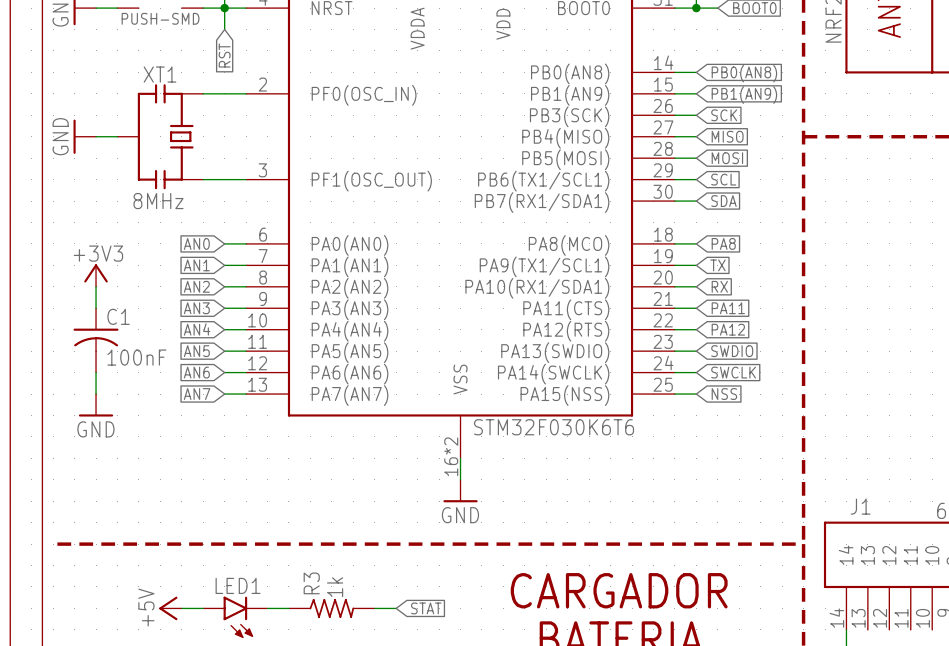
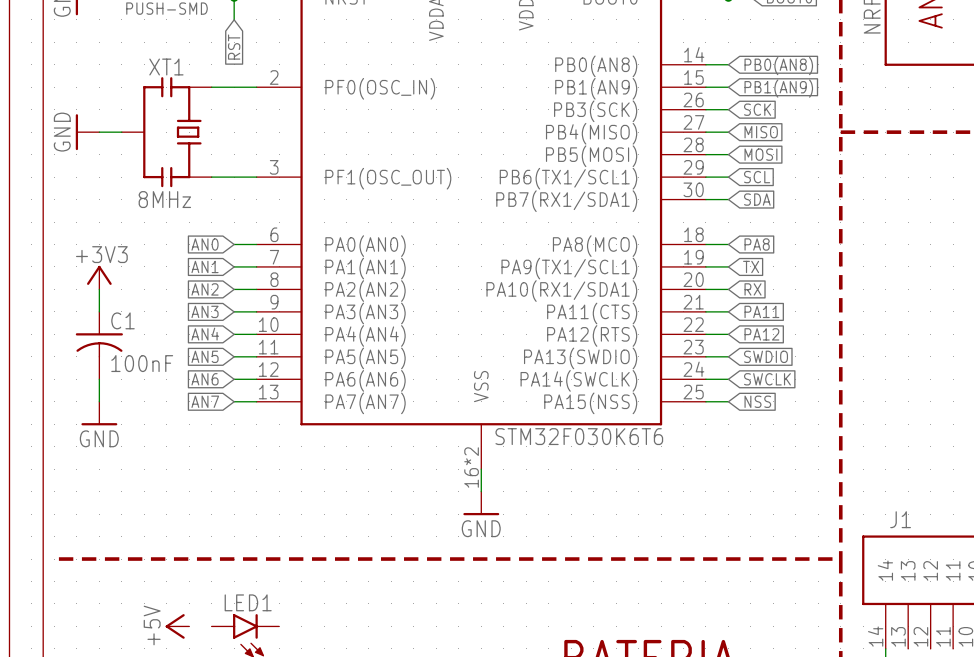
text: CARGADOR (619, 590) -> none
wire: (181, 608) (203, 608) -> none
wire: (267, 608) (288, 608) -> none
R3: 1k (331, 608) -> none
wire: (374, 608) (396, 608) -> none
global label: STAT (426, 608) -> none

